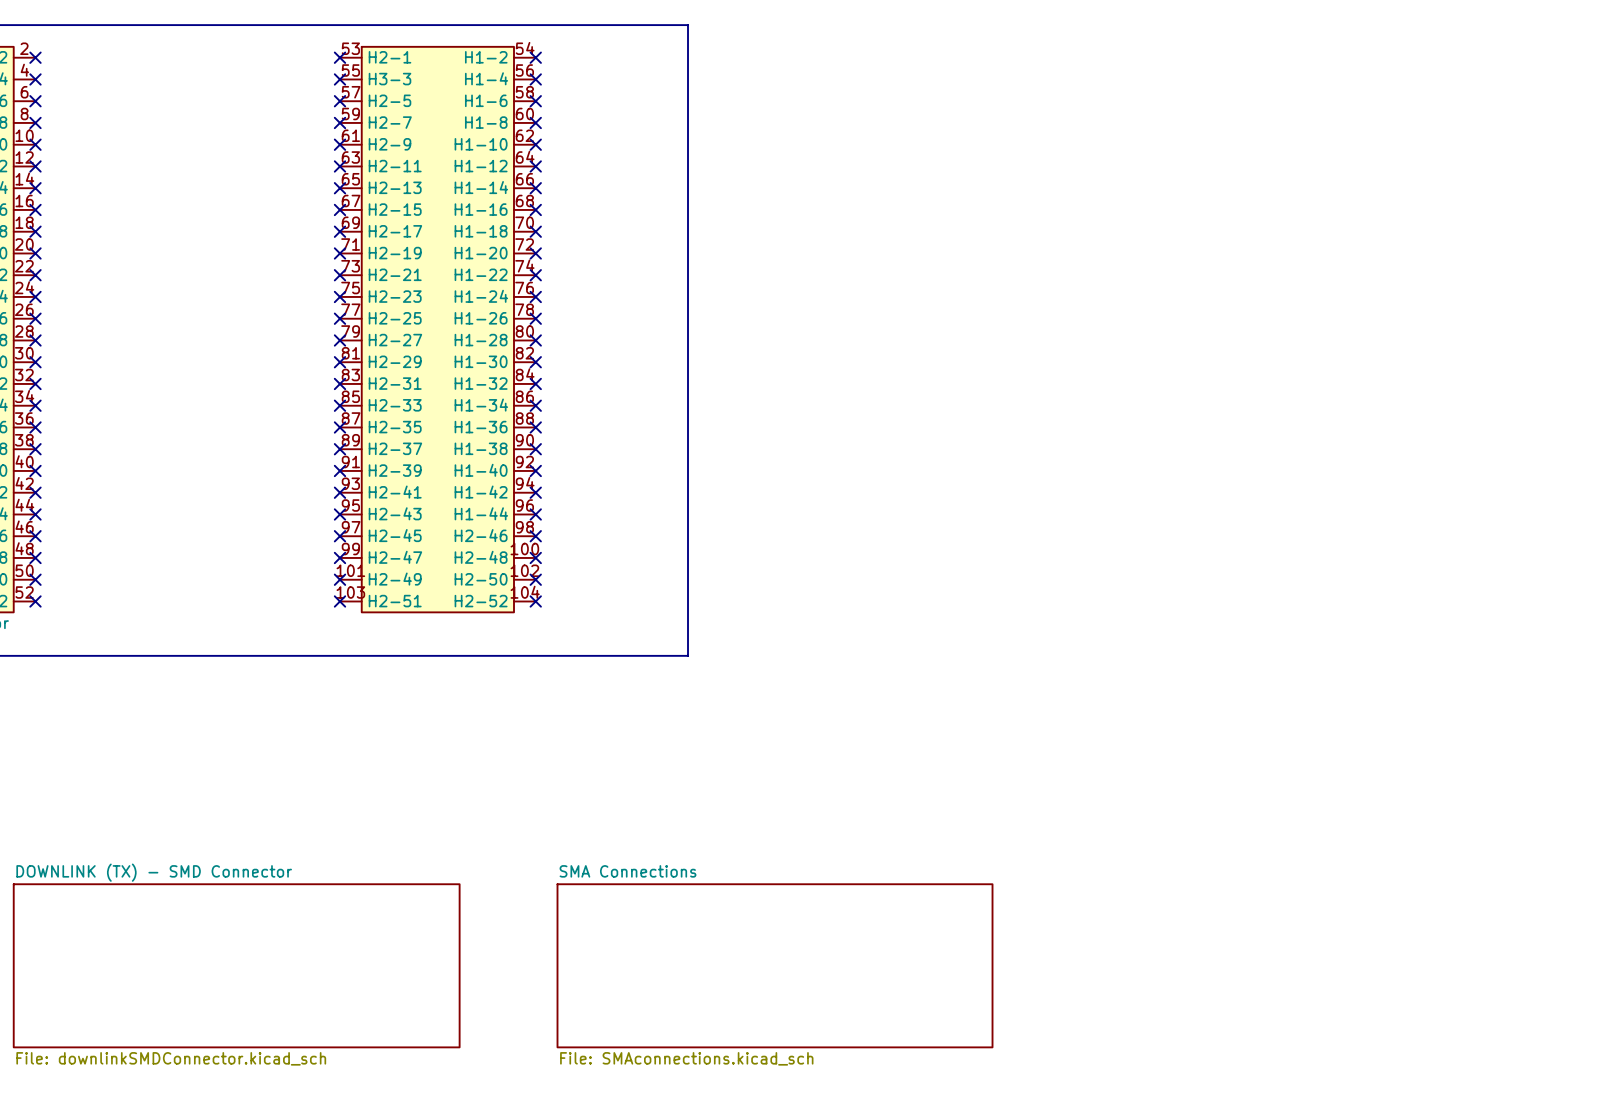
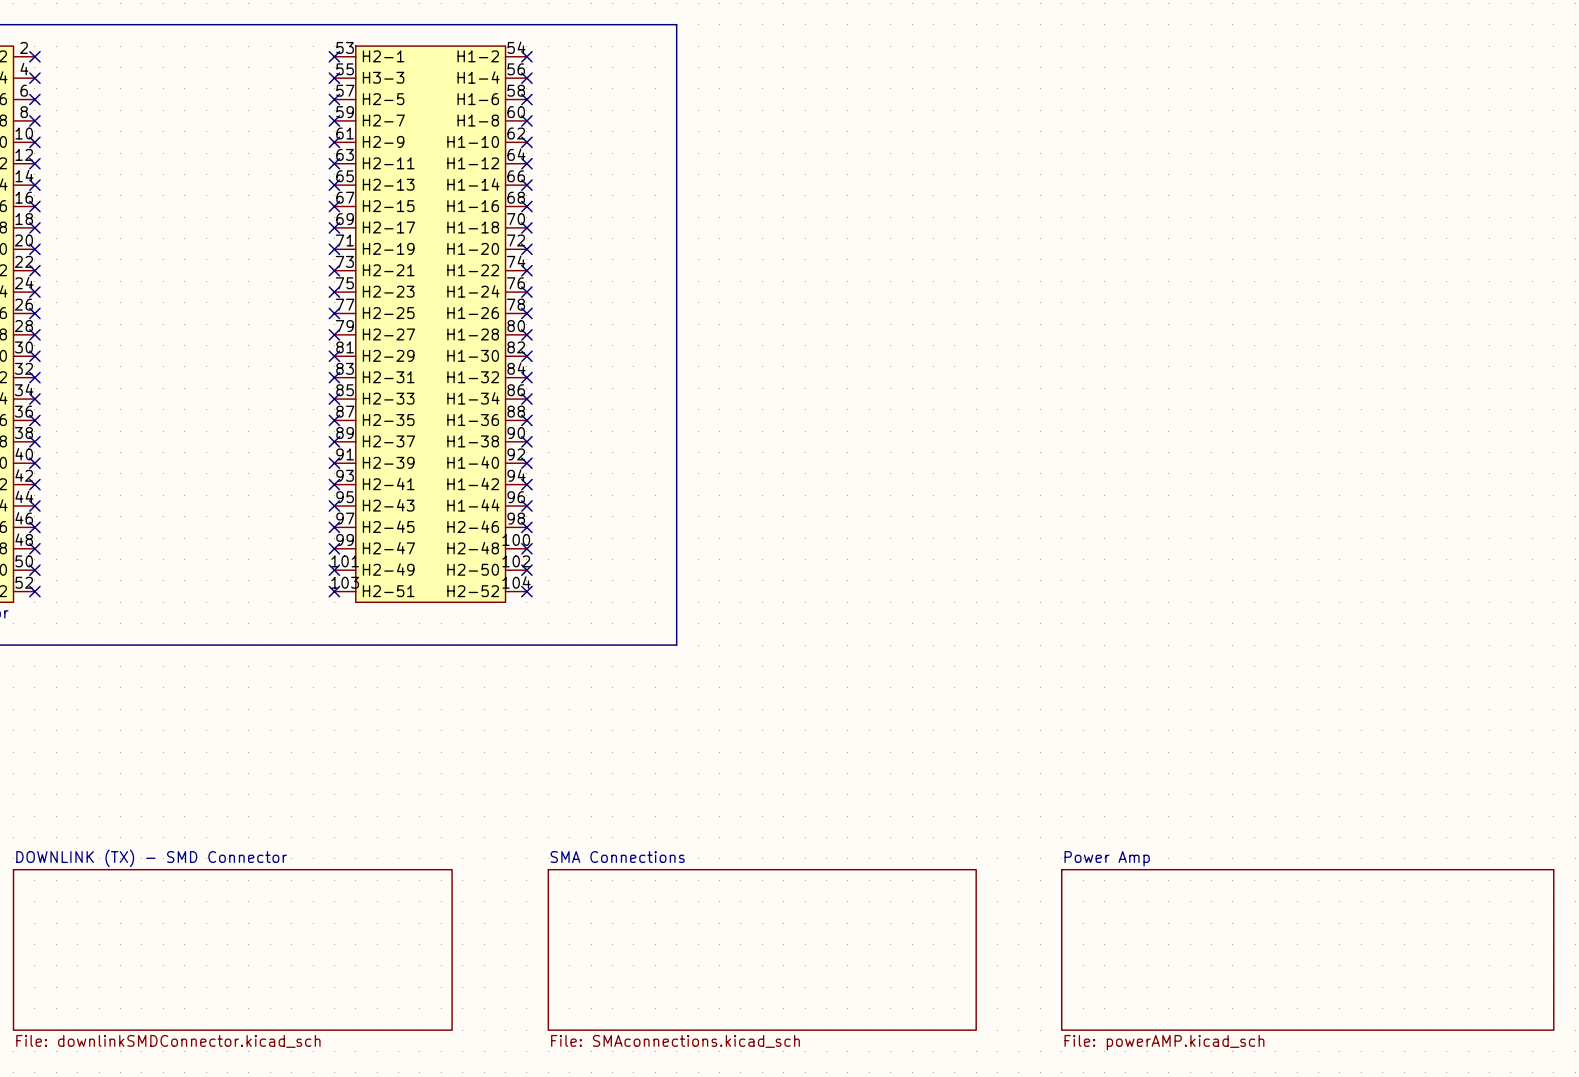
sheet Power Amp: none -> File: powerAMP.kicad_sch (1307, 949)

